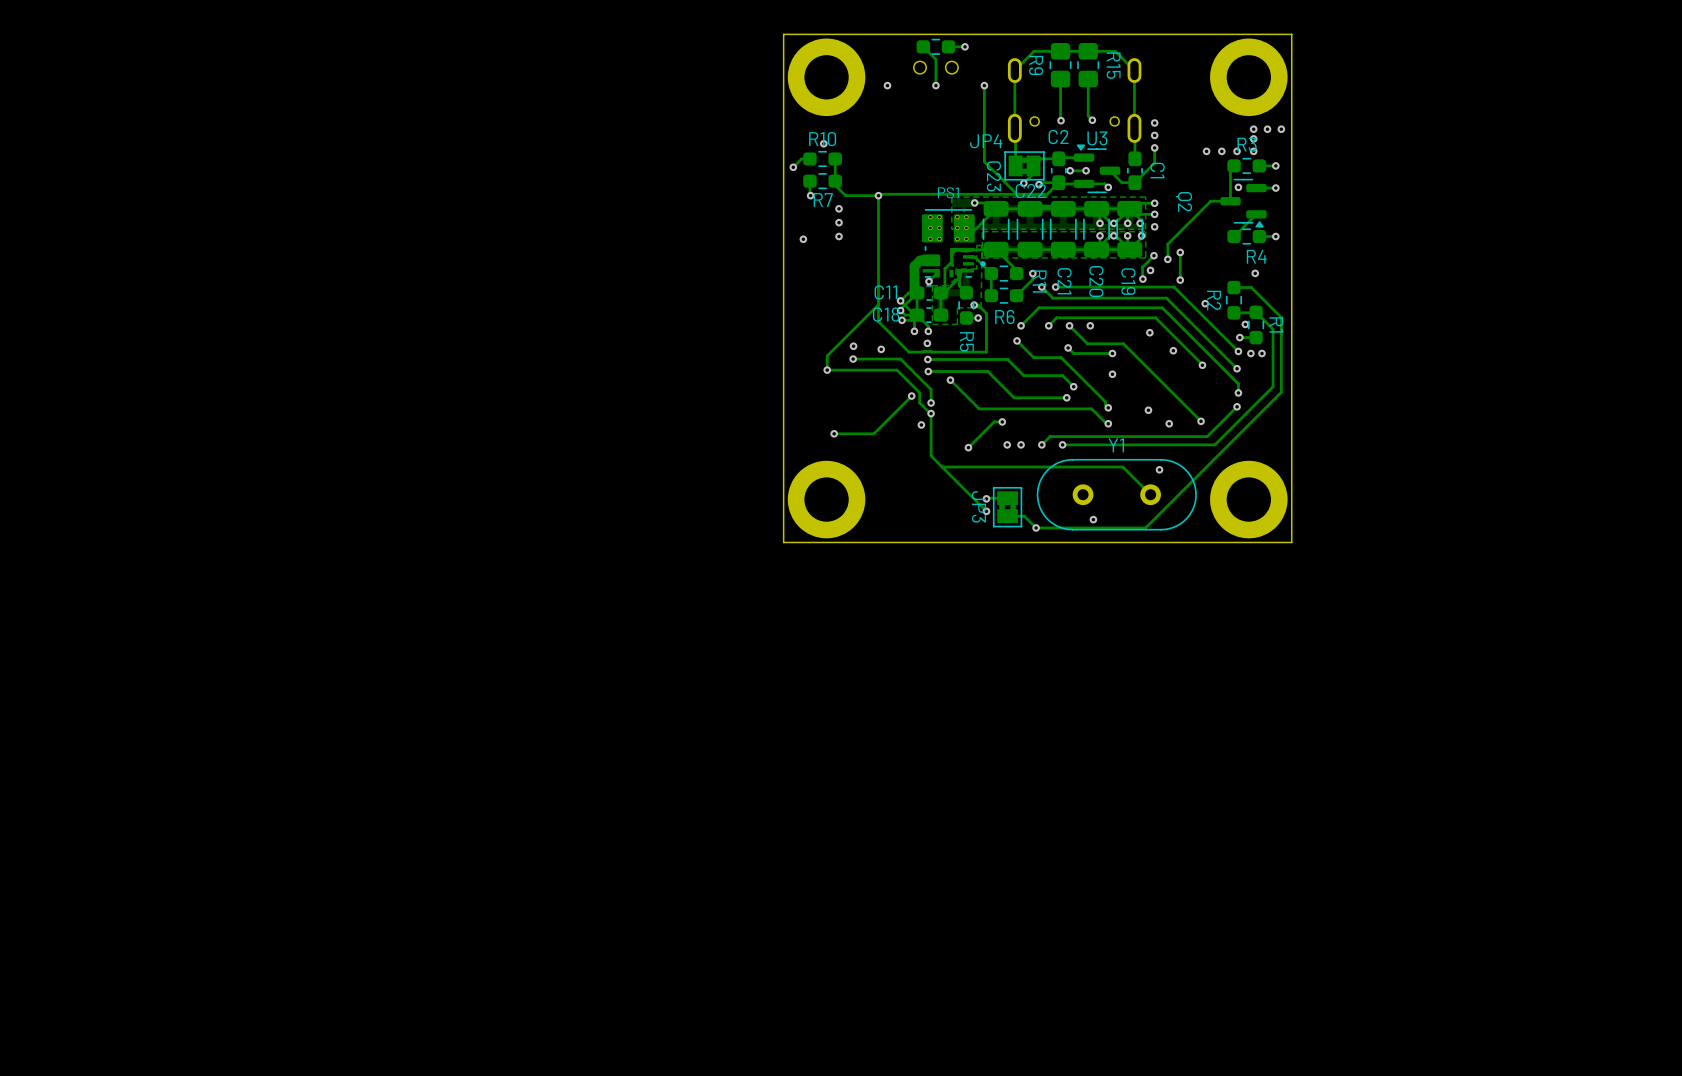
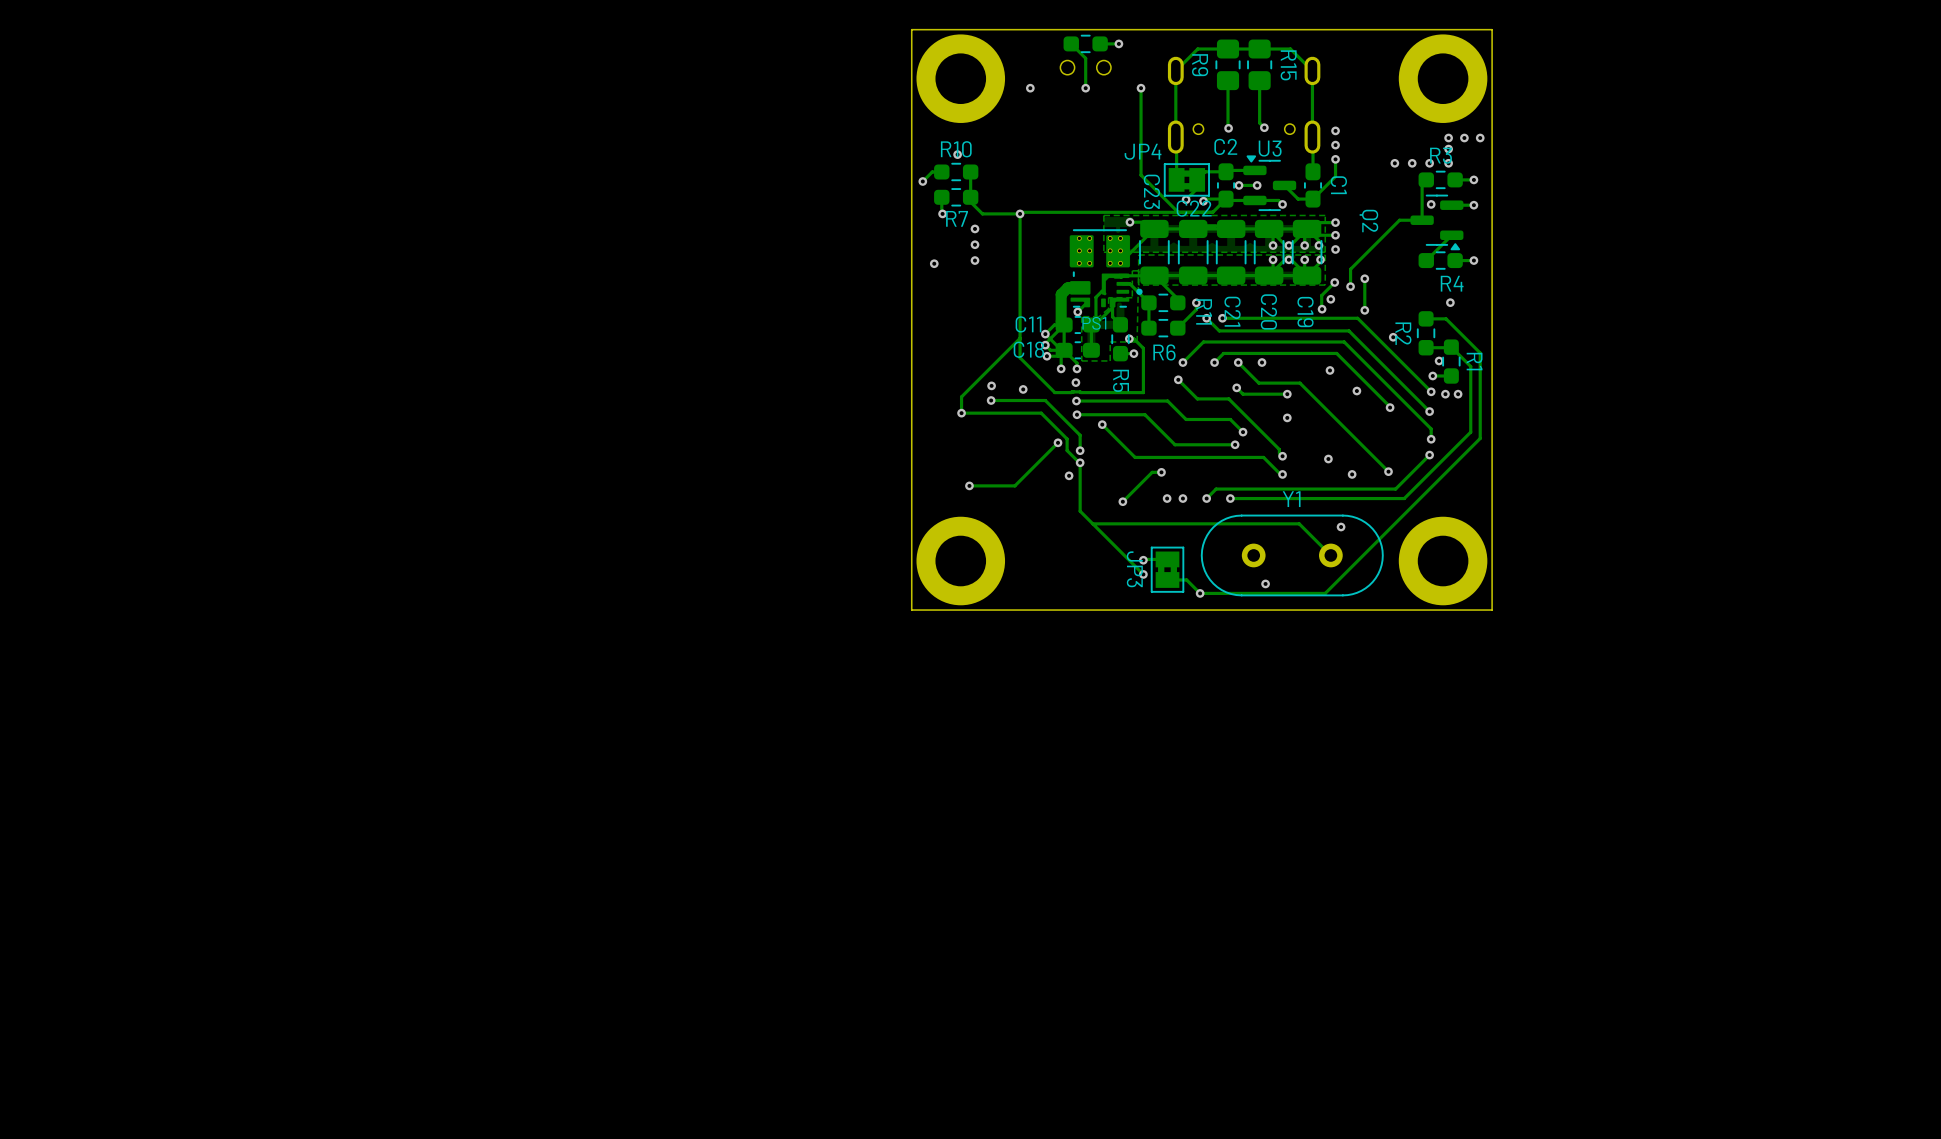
PS1 name position: PS1 (948, 192) -> PS1 (1094, 323)

